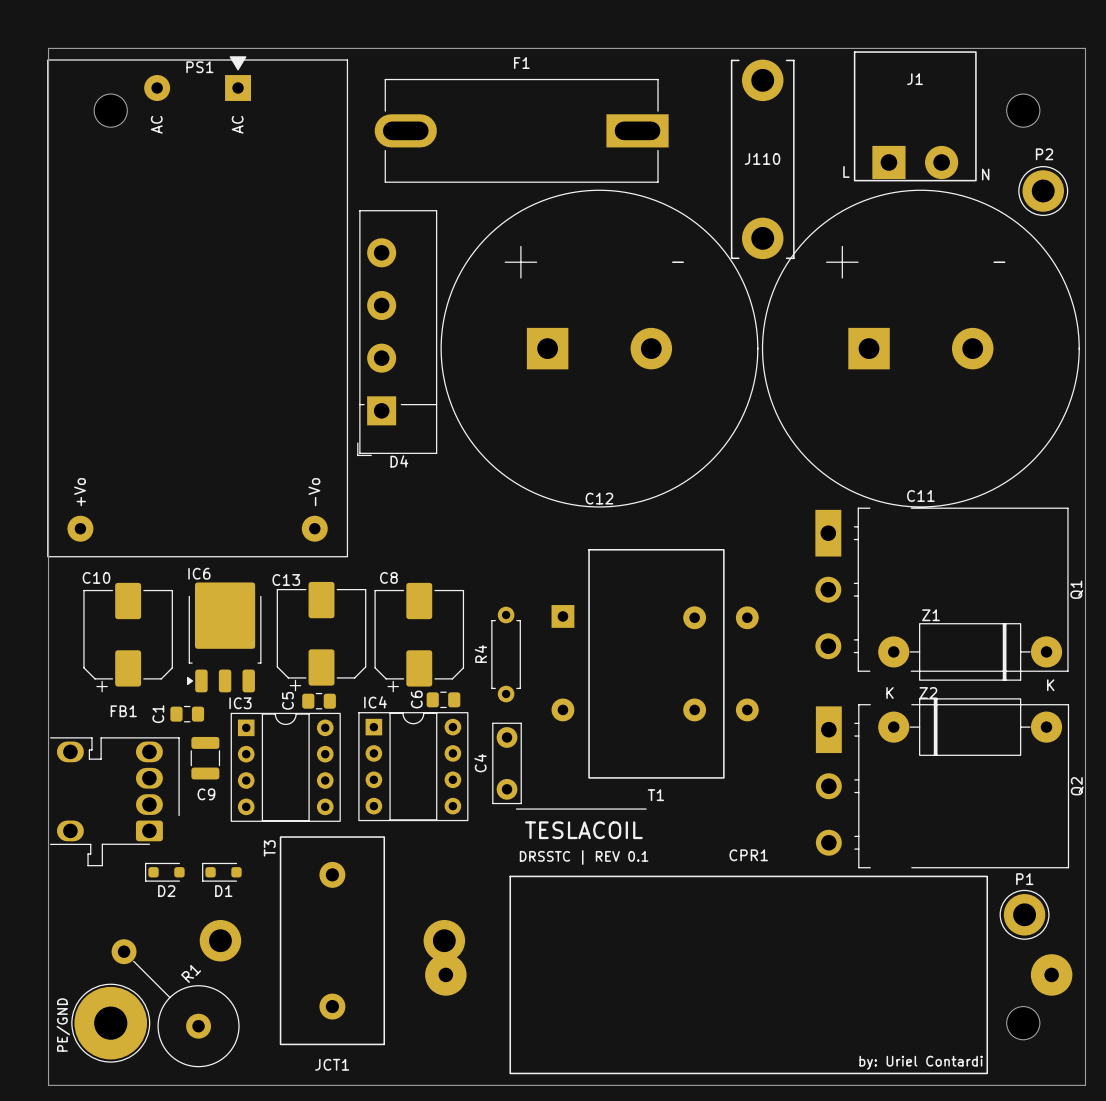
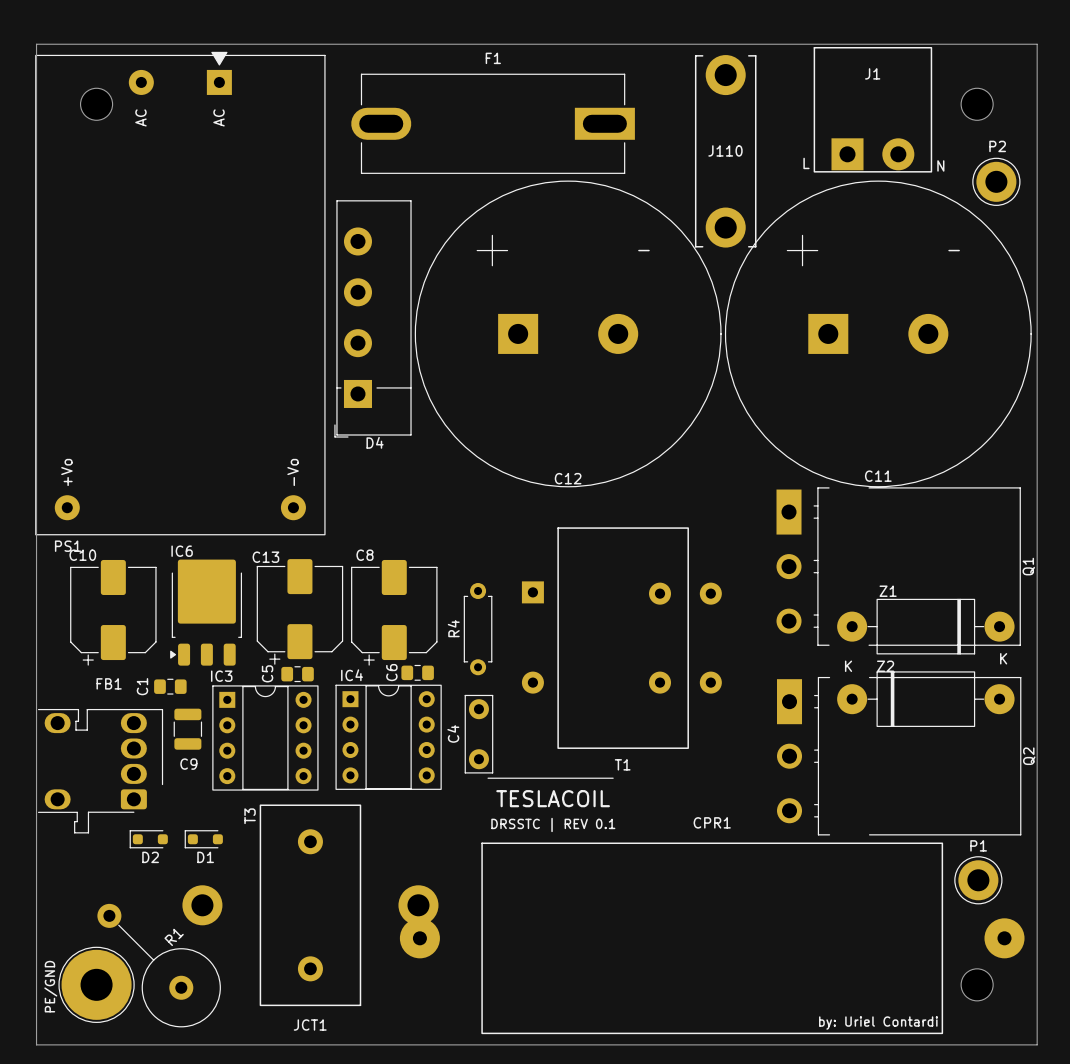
PS1 name position: PS1 (199, 67) -> PS1 (68, 546)

